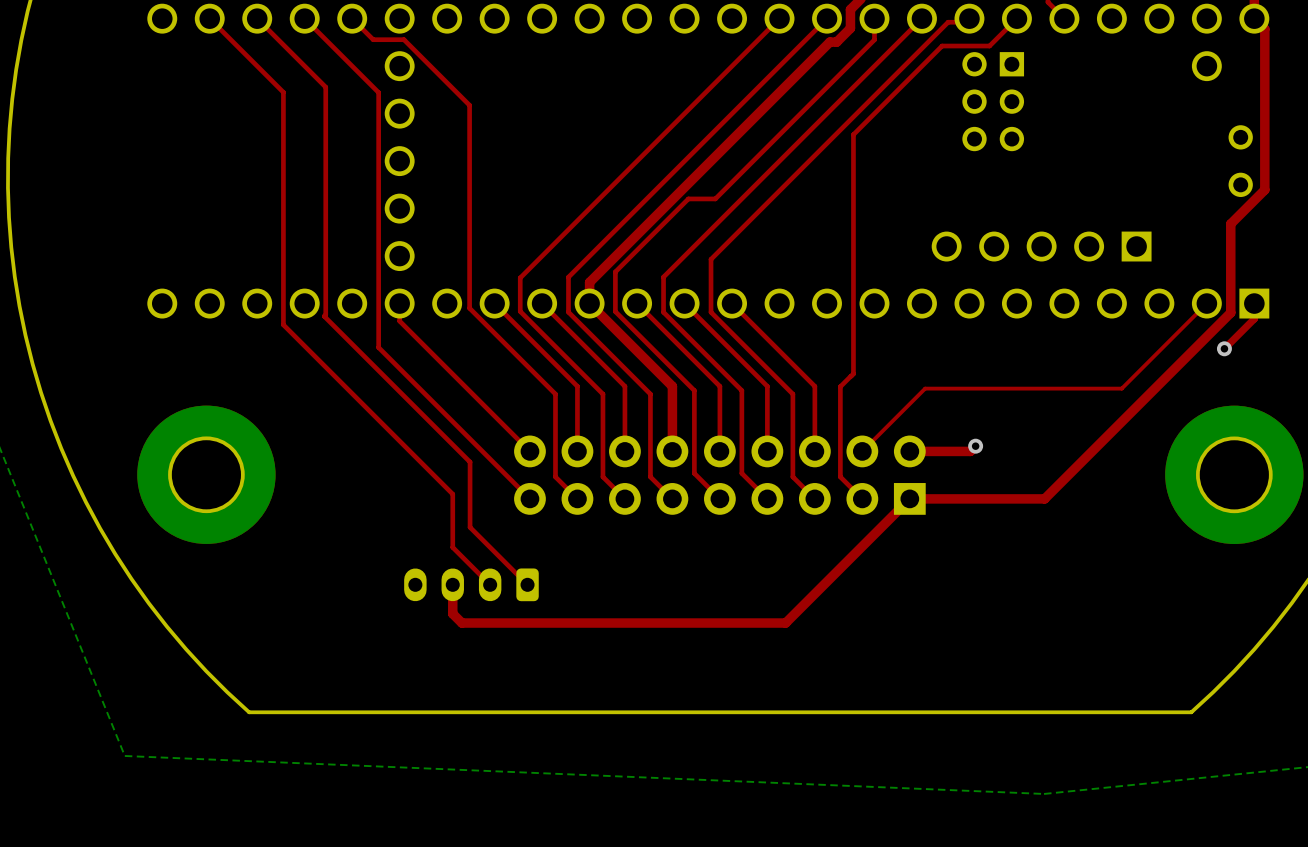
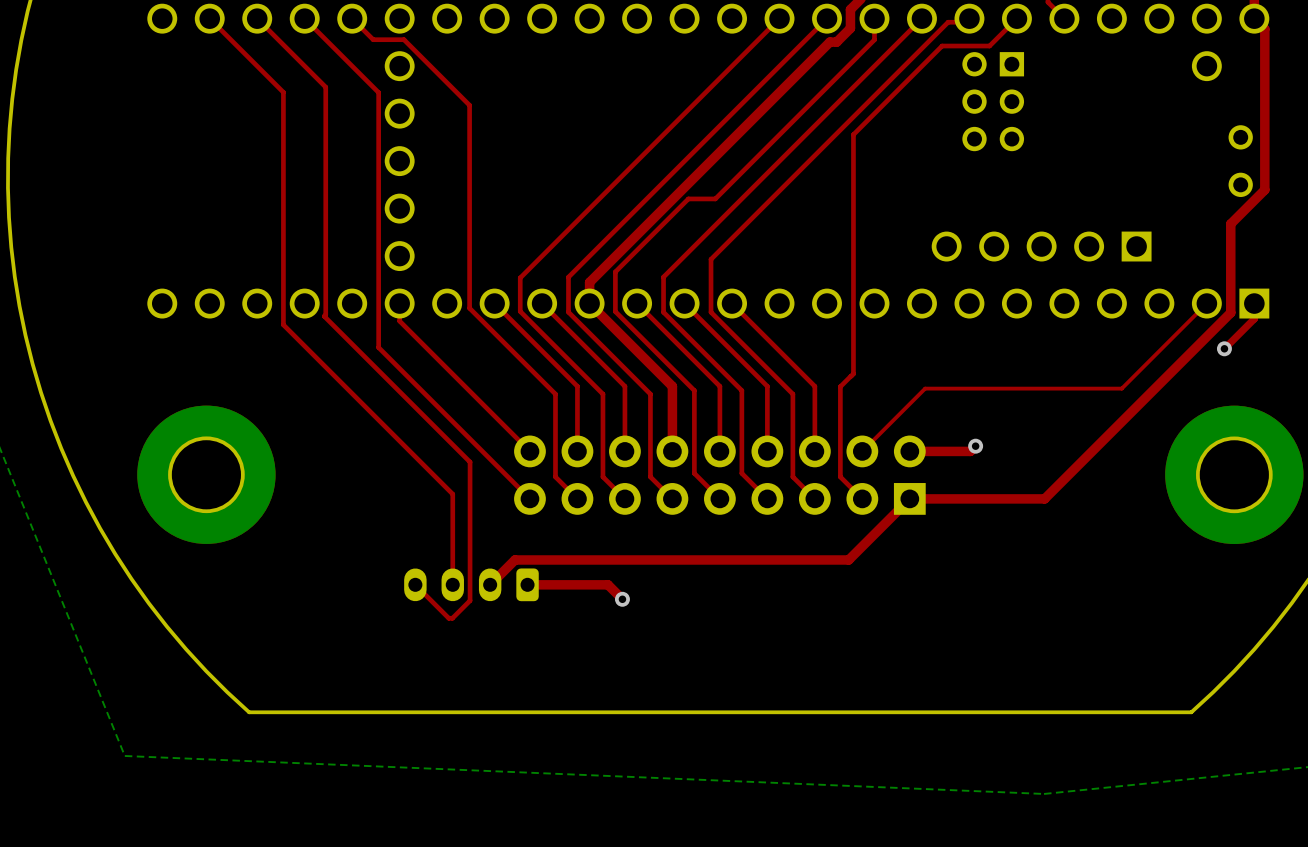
top track: (470, 527) (527, 584) -> (470, 527) (470, 600) (452, 618) (448, 618) (415, 584)
top track: (452, 547) (490, 584) -> (452, 547) (452, 584)
top track: (848, 559) (785, 623) (461, 623) (452, 613) (452, 584) -> (848, 559) (514, 559) (490, 584)
top track: none -> (527, 584) (607, 584) (622, 599)
via: none -> (622, 599)

